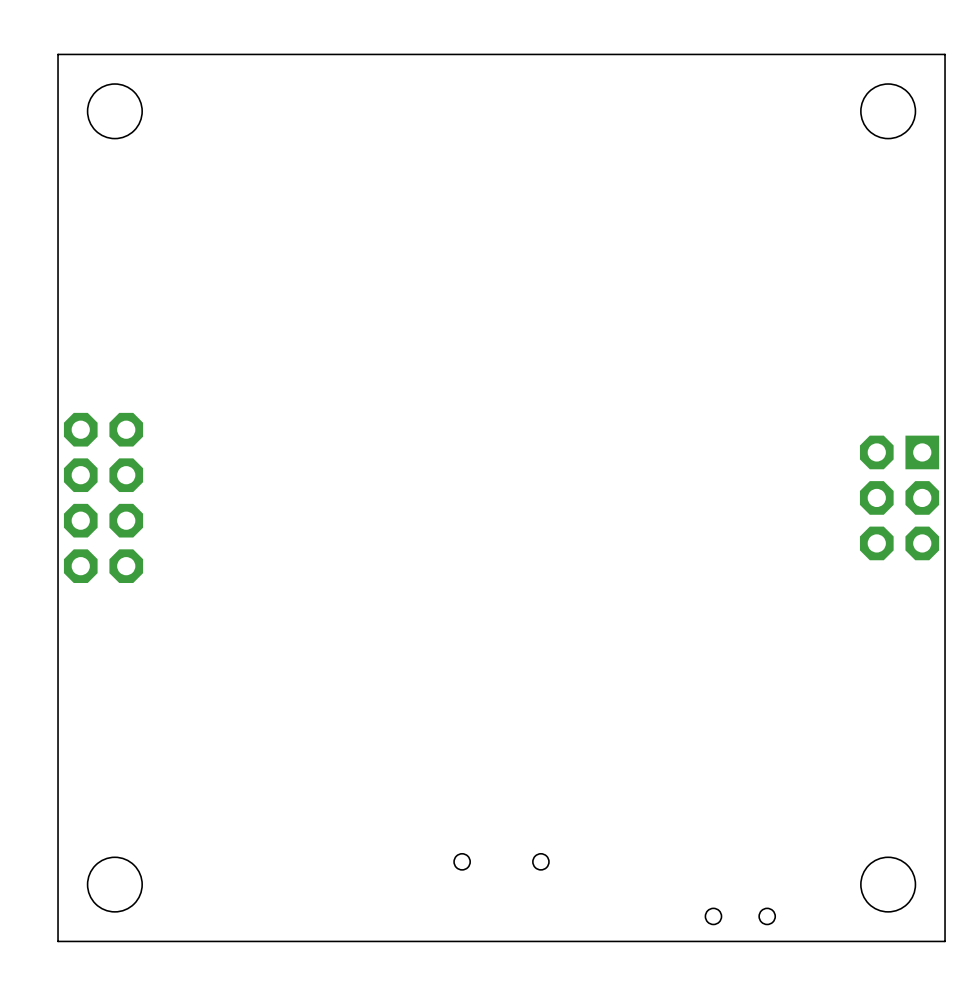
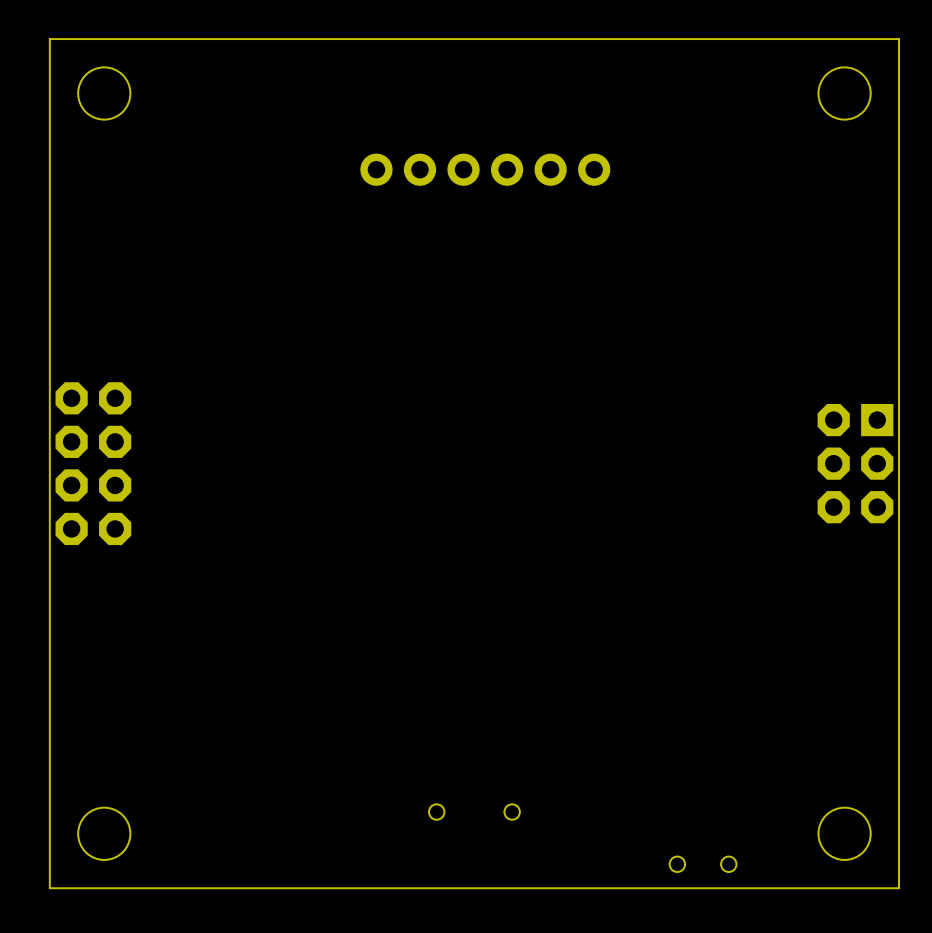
part: none -> (485, 169)

